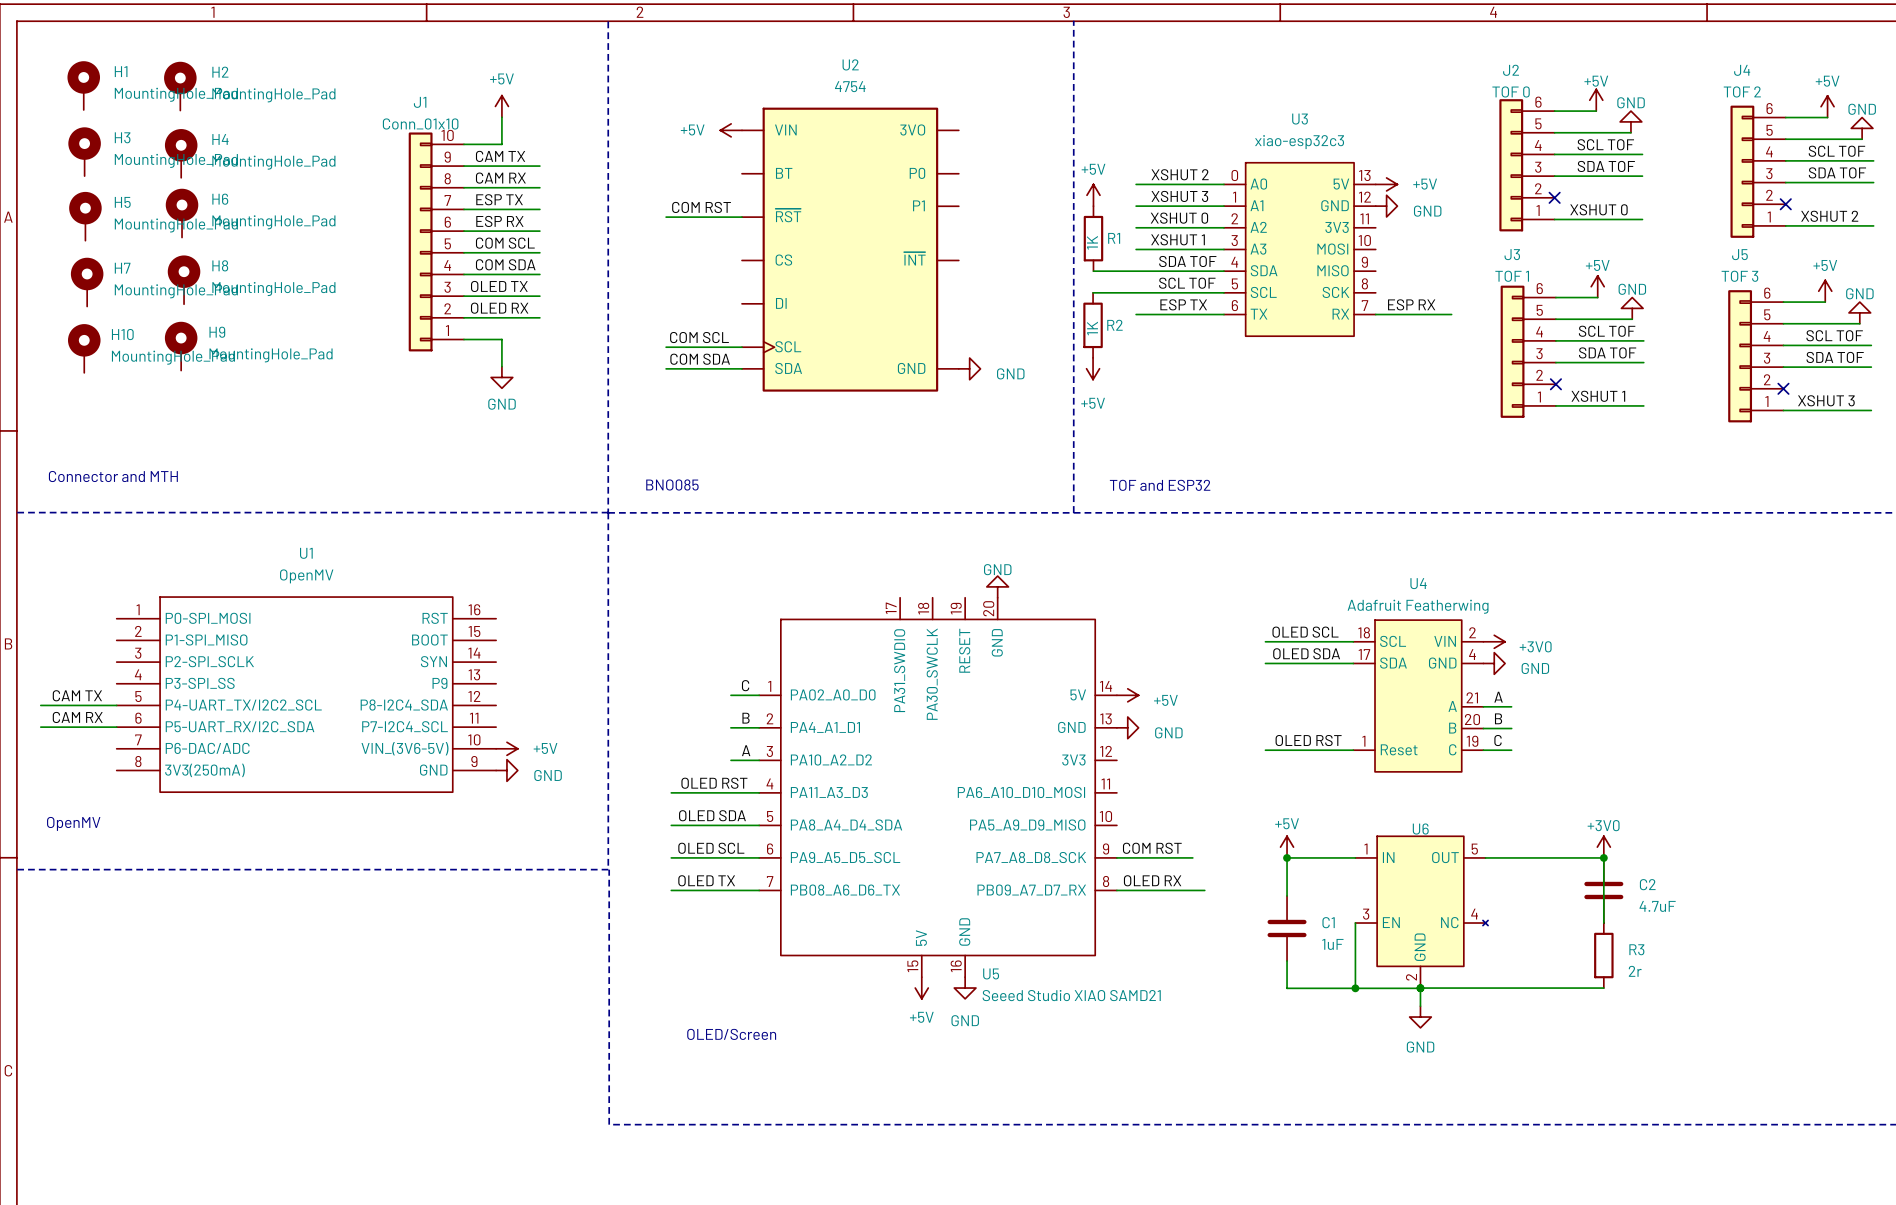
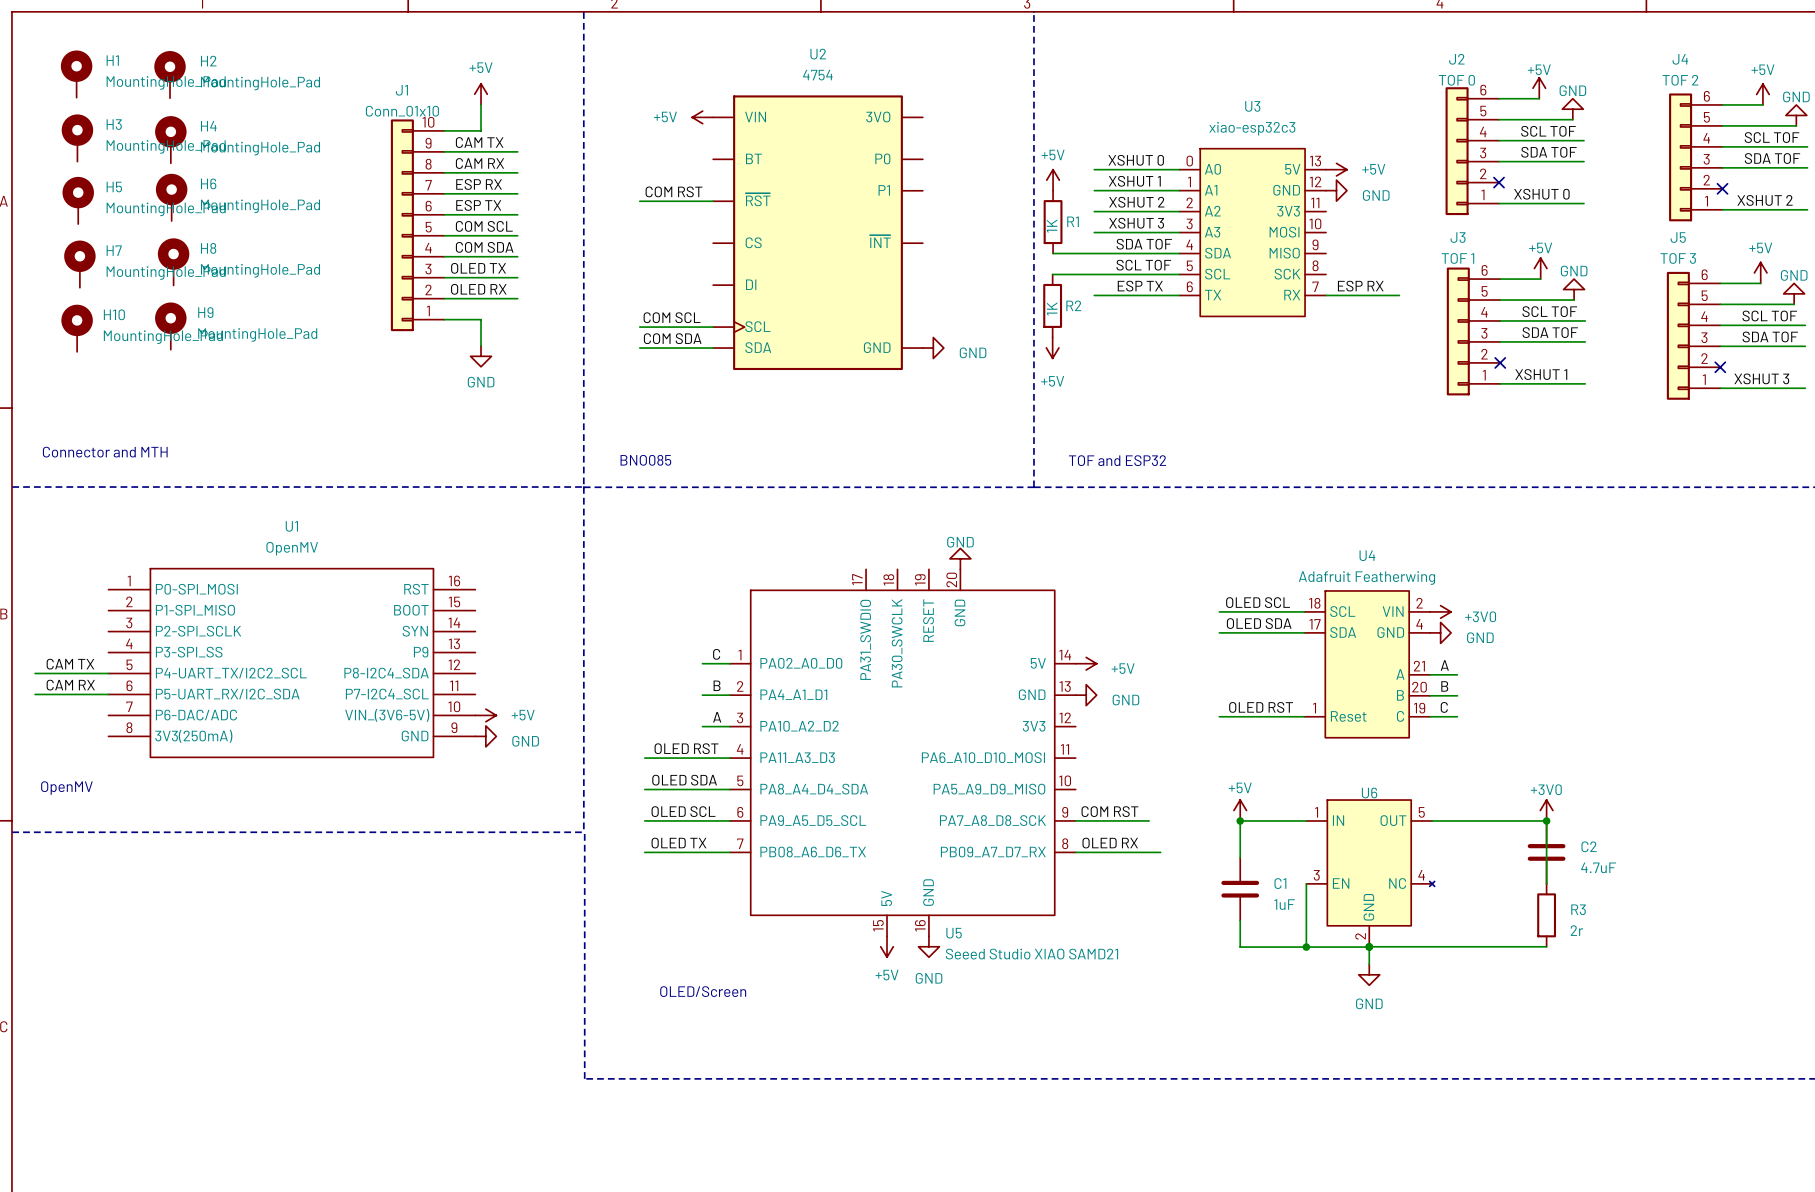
label: XSHUT 2 (1180, 174) -> XSHUT 0 (1136, 160)
label: XSHUT 3 (1179, 196) -> XSHUT 1 (1134, 181)
label: ESP TX (499, 199) -> ESP RX (479, 184)
label: XSHUT 0 (1179, 218) -> XSHUT 2 (1136, 202)
label: ESP RX (499, 221) -> ESP TX (478, 205)
label: XSHUT 1 (1178, 239) -> XSHUT 3 (1136, 223)

